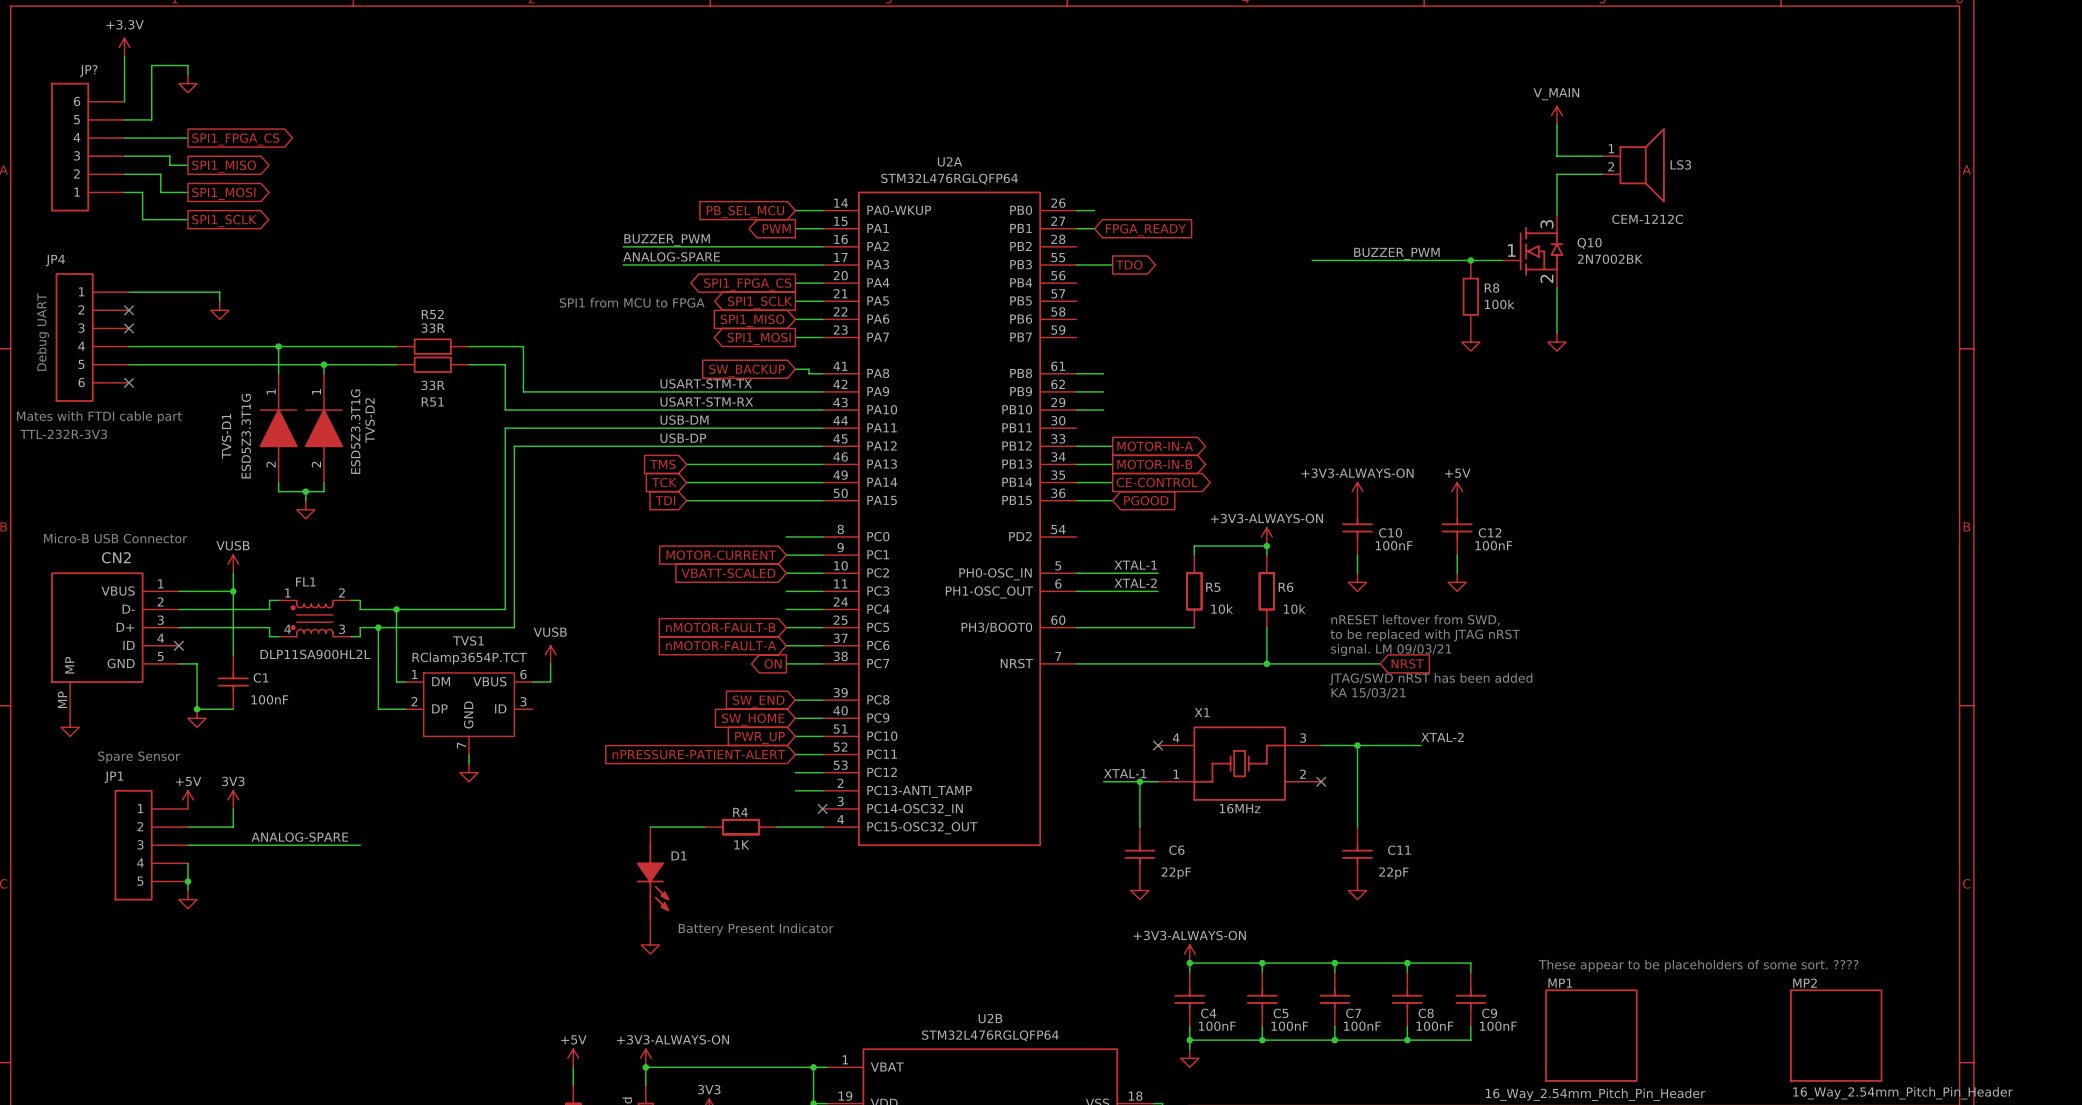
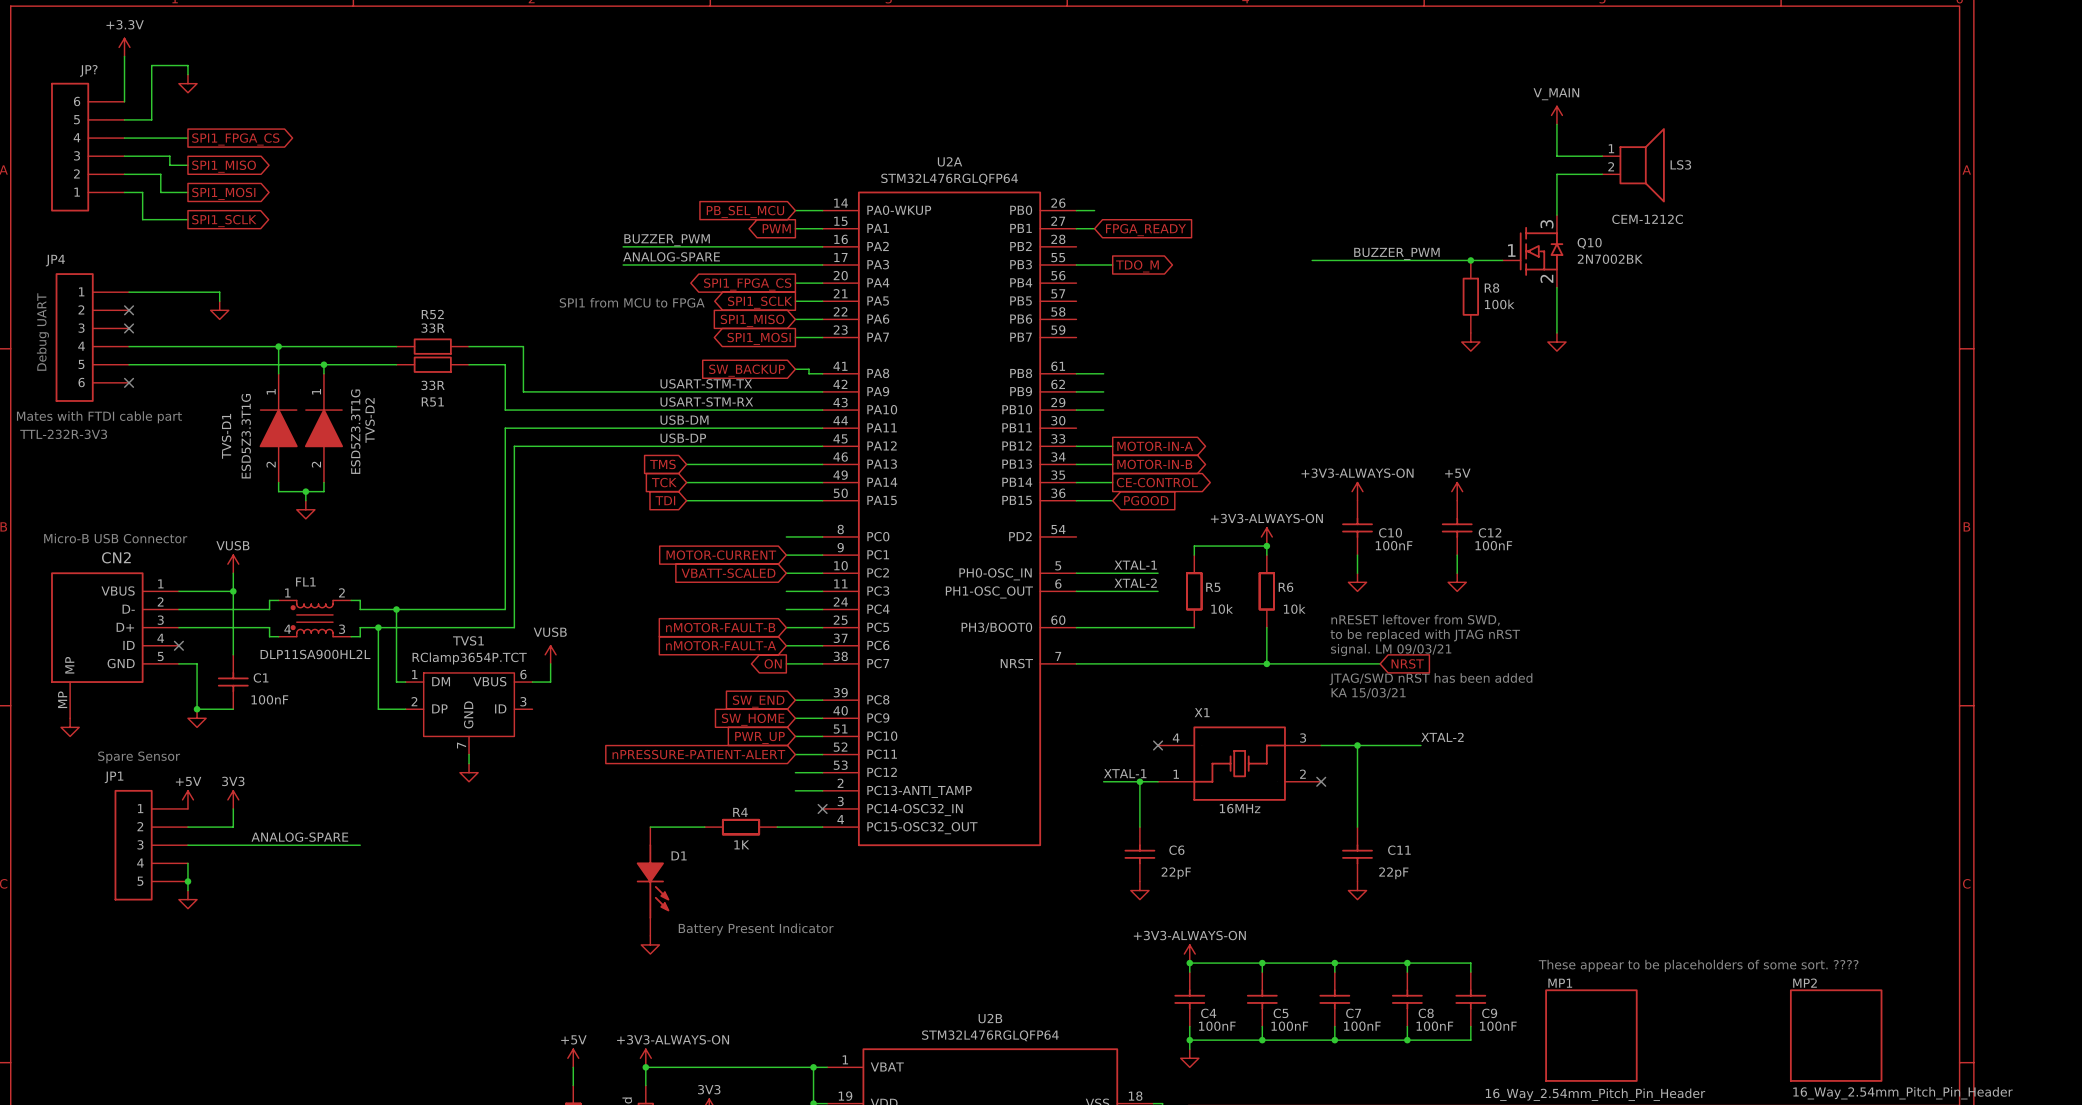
global label: TDO (1129, 265) -> TDO_M (1137, 266)

